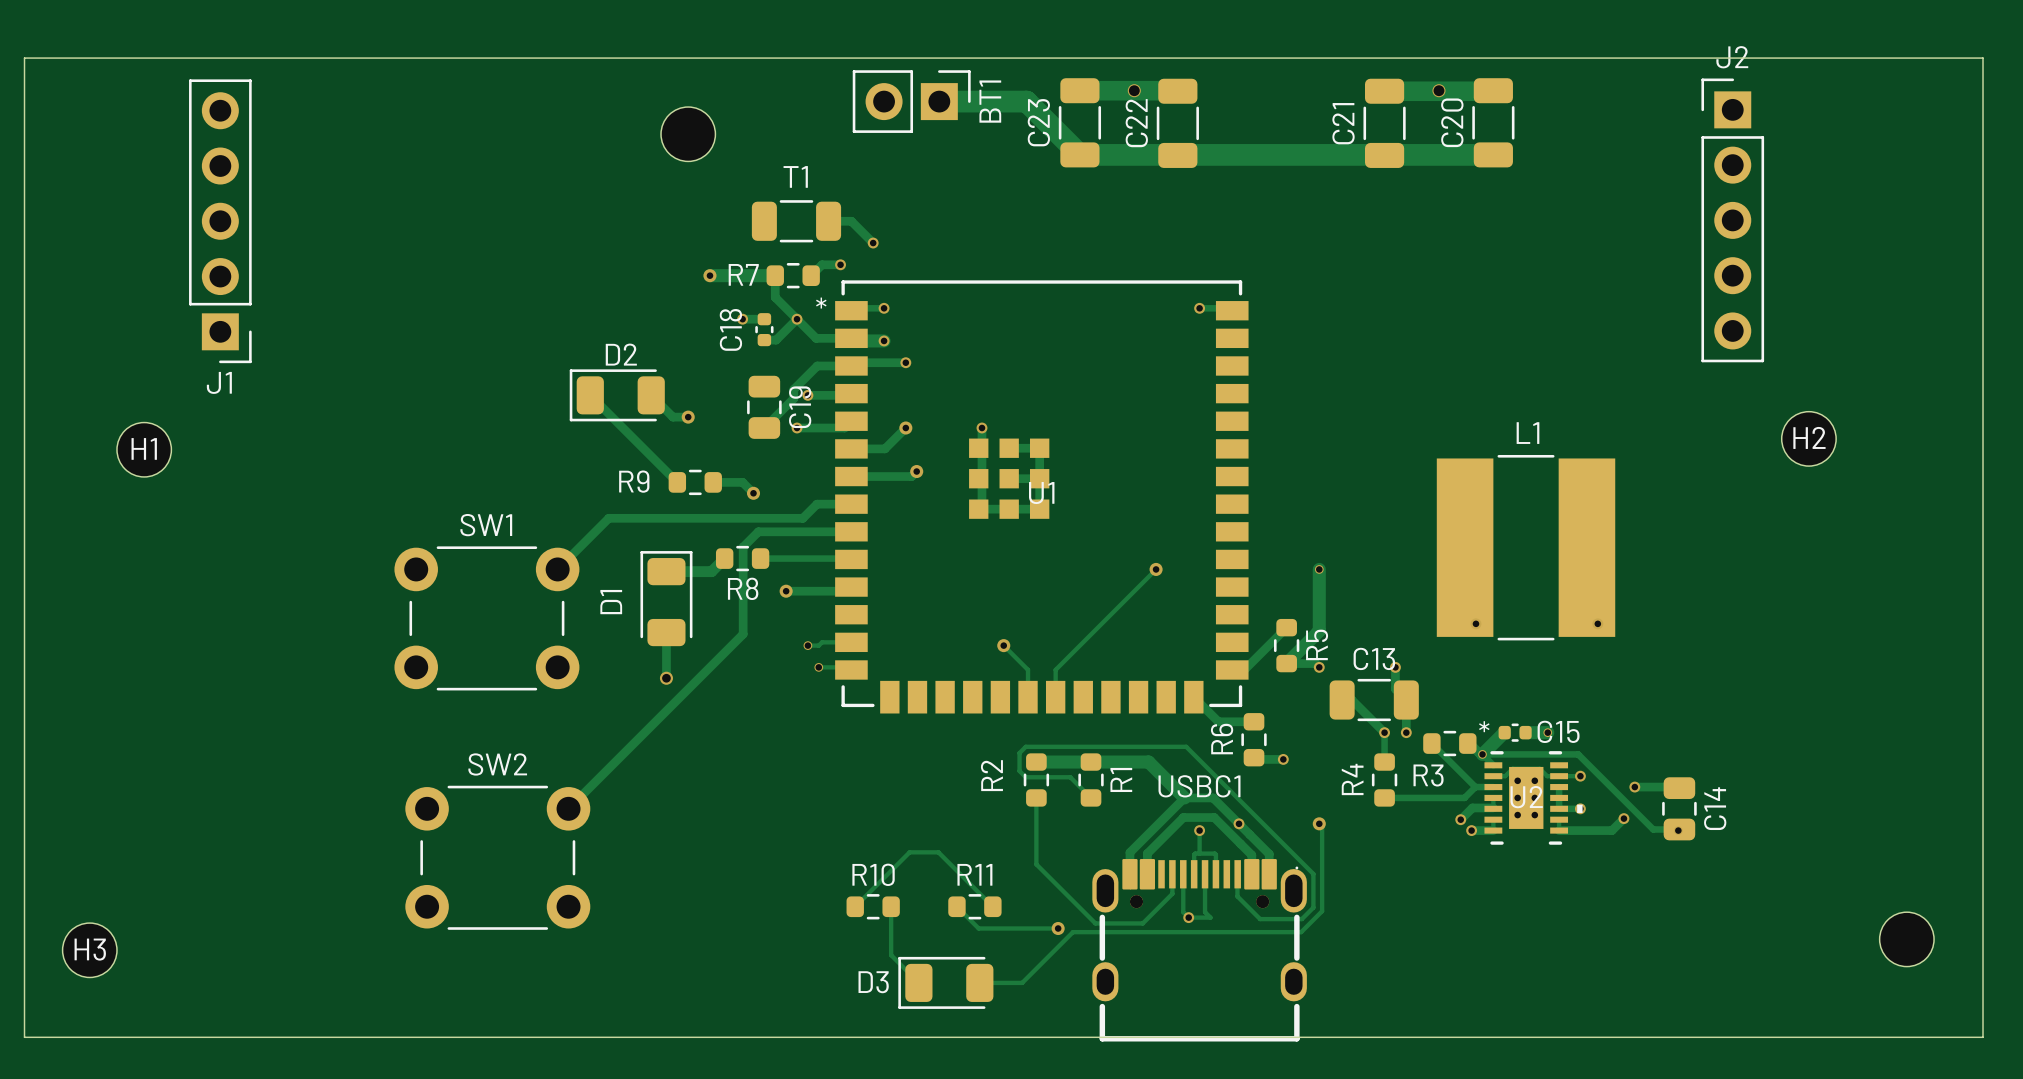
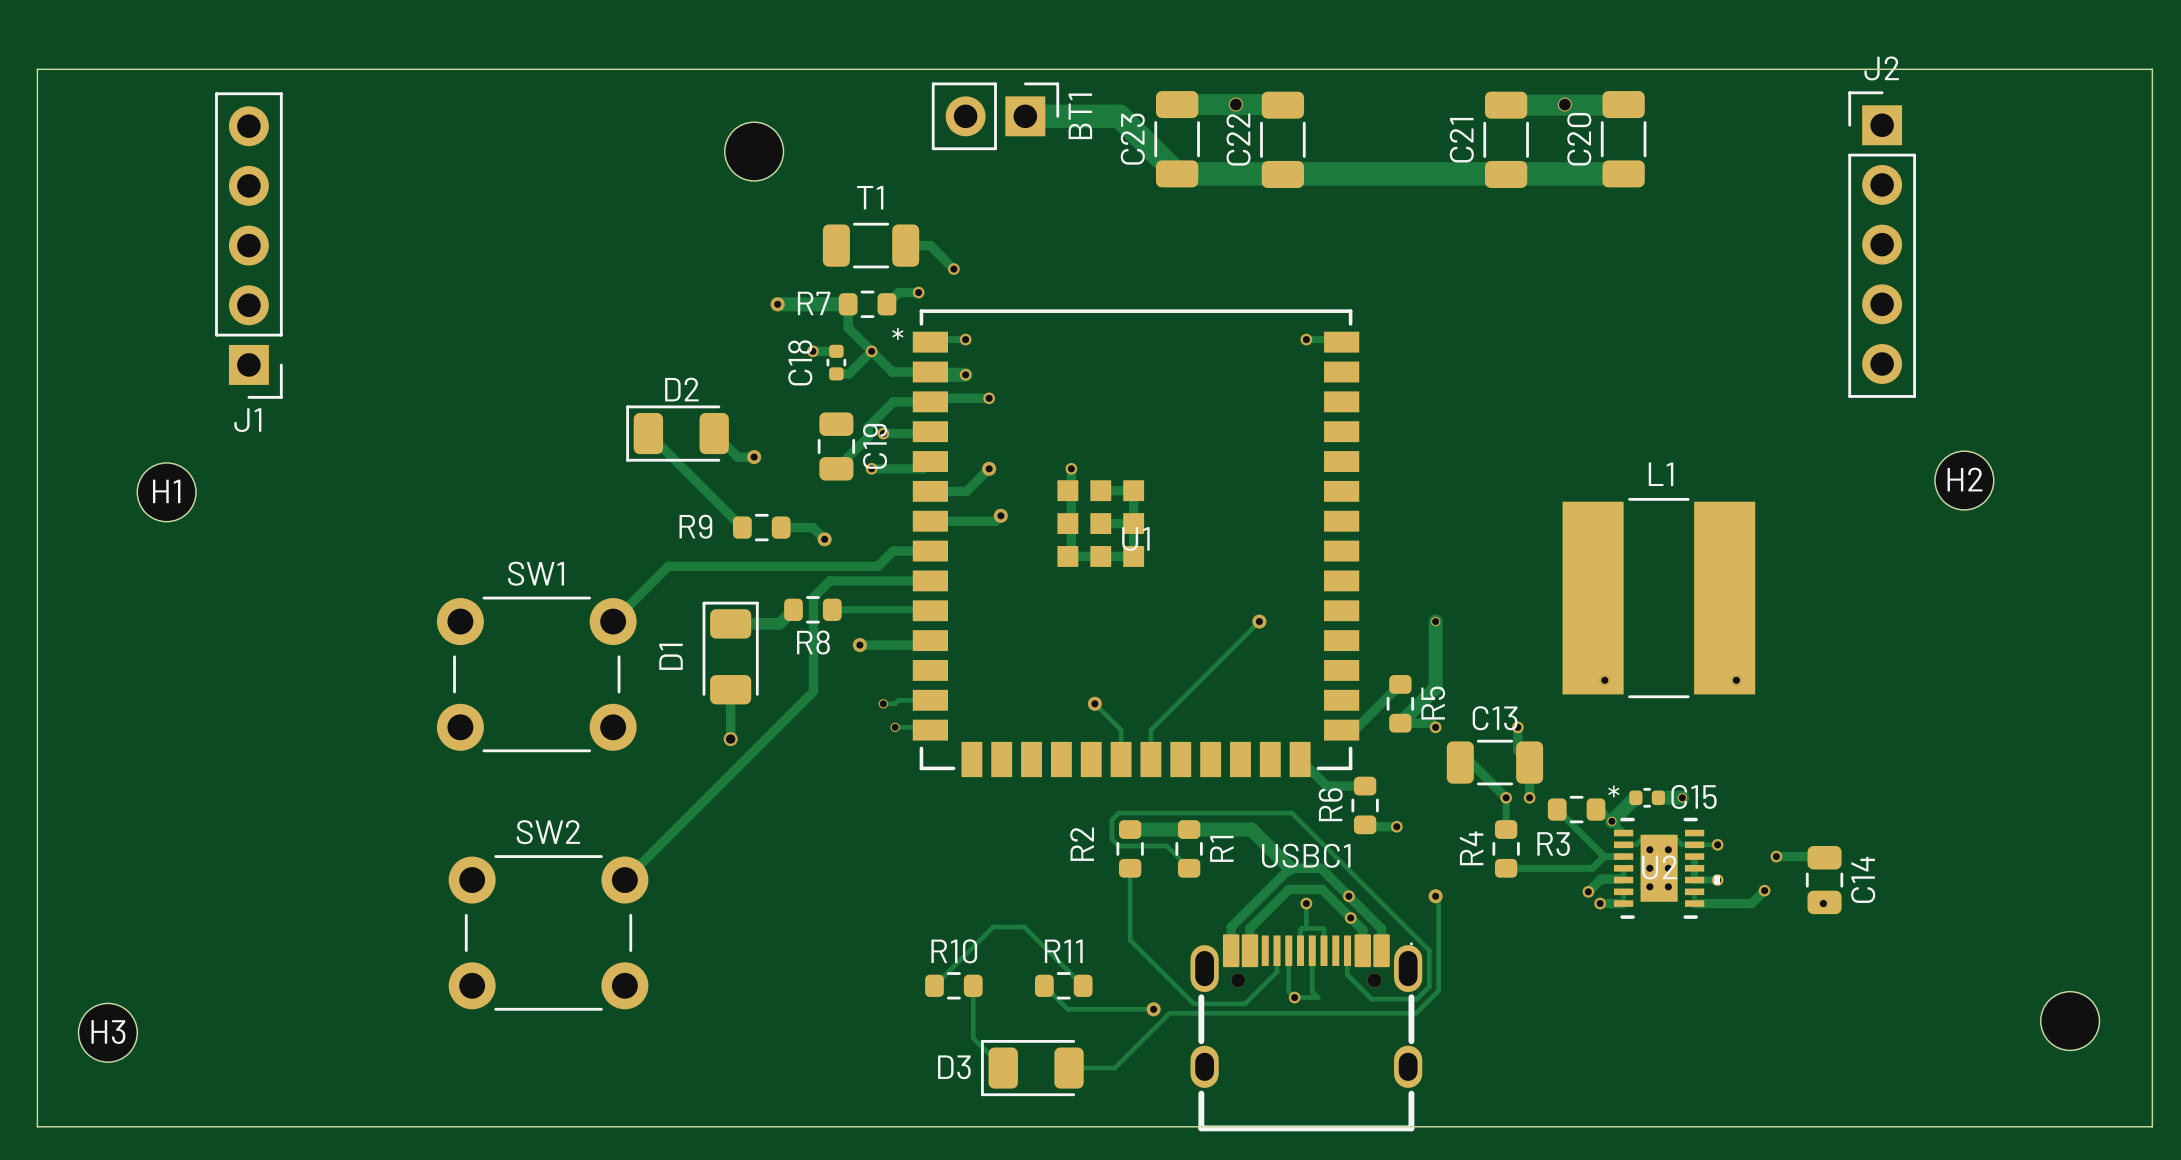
track: (1467, 743) (1478, 754) (1578, 754) (1653, 829) (1679, 829) -> none
via: none -> (1350, 917)

